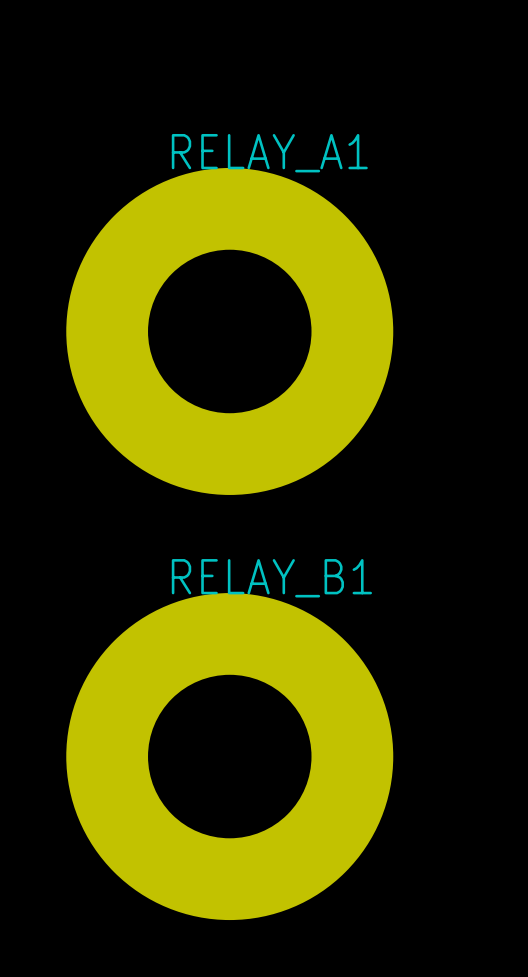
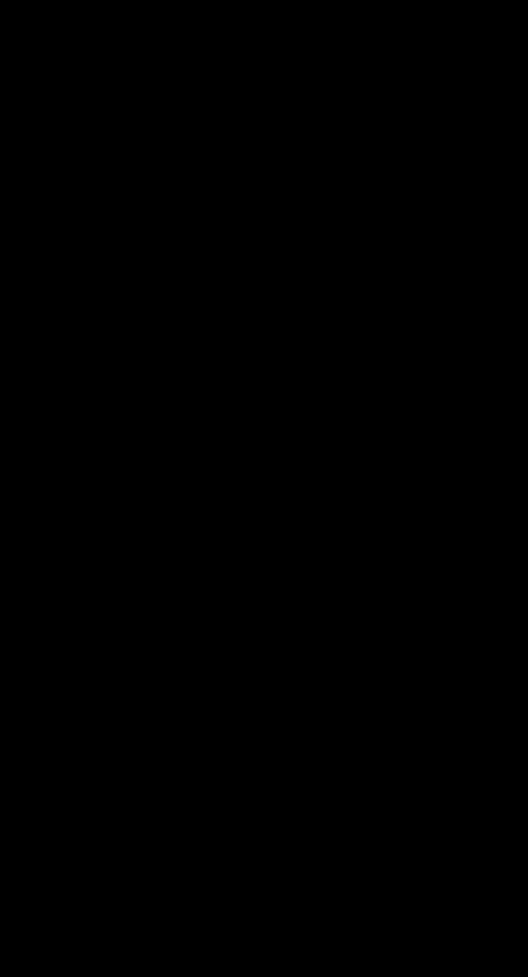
RELAY_A1: (229, 331) -> none
RELAY_B1: (229, 756) -> none

